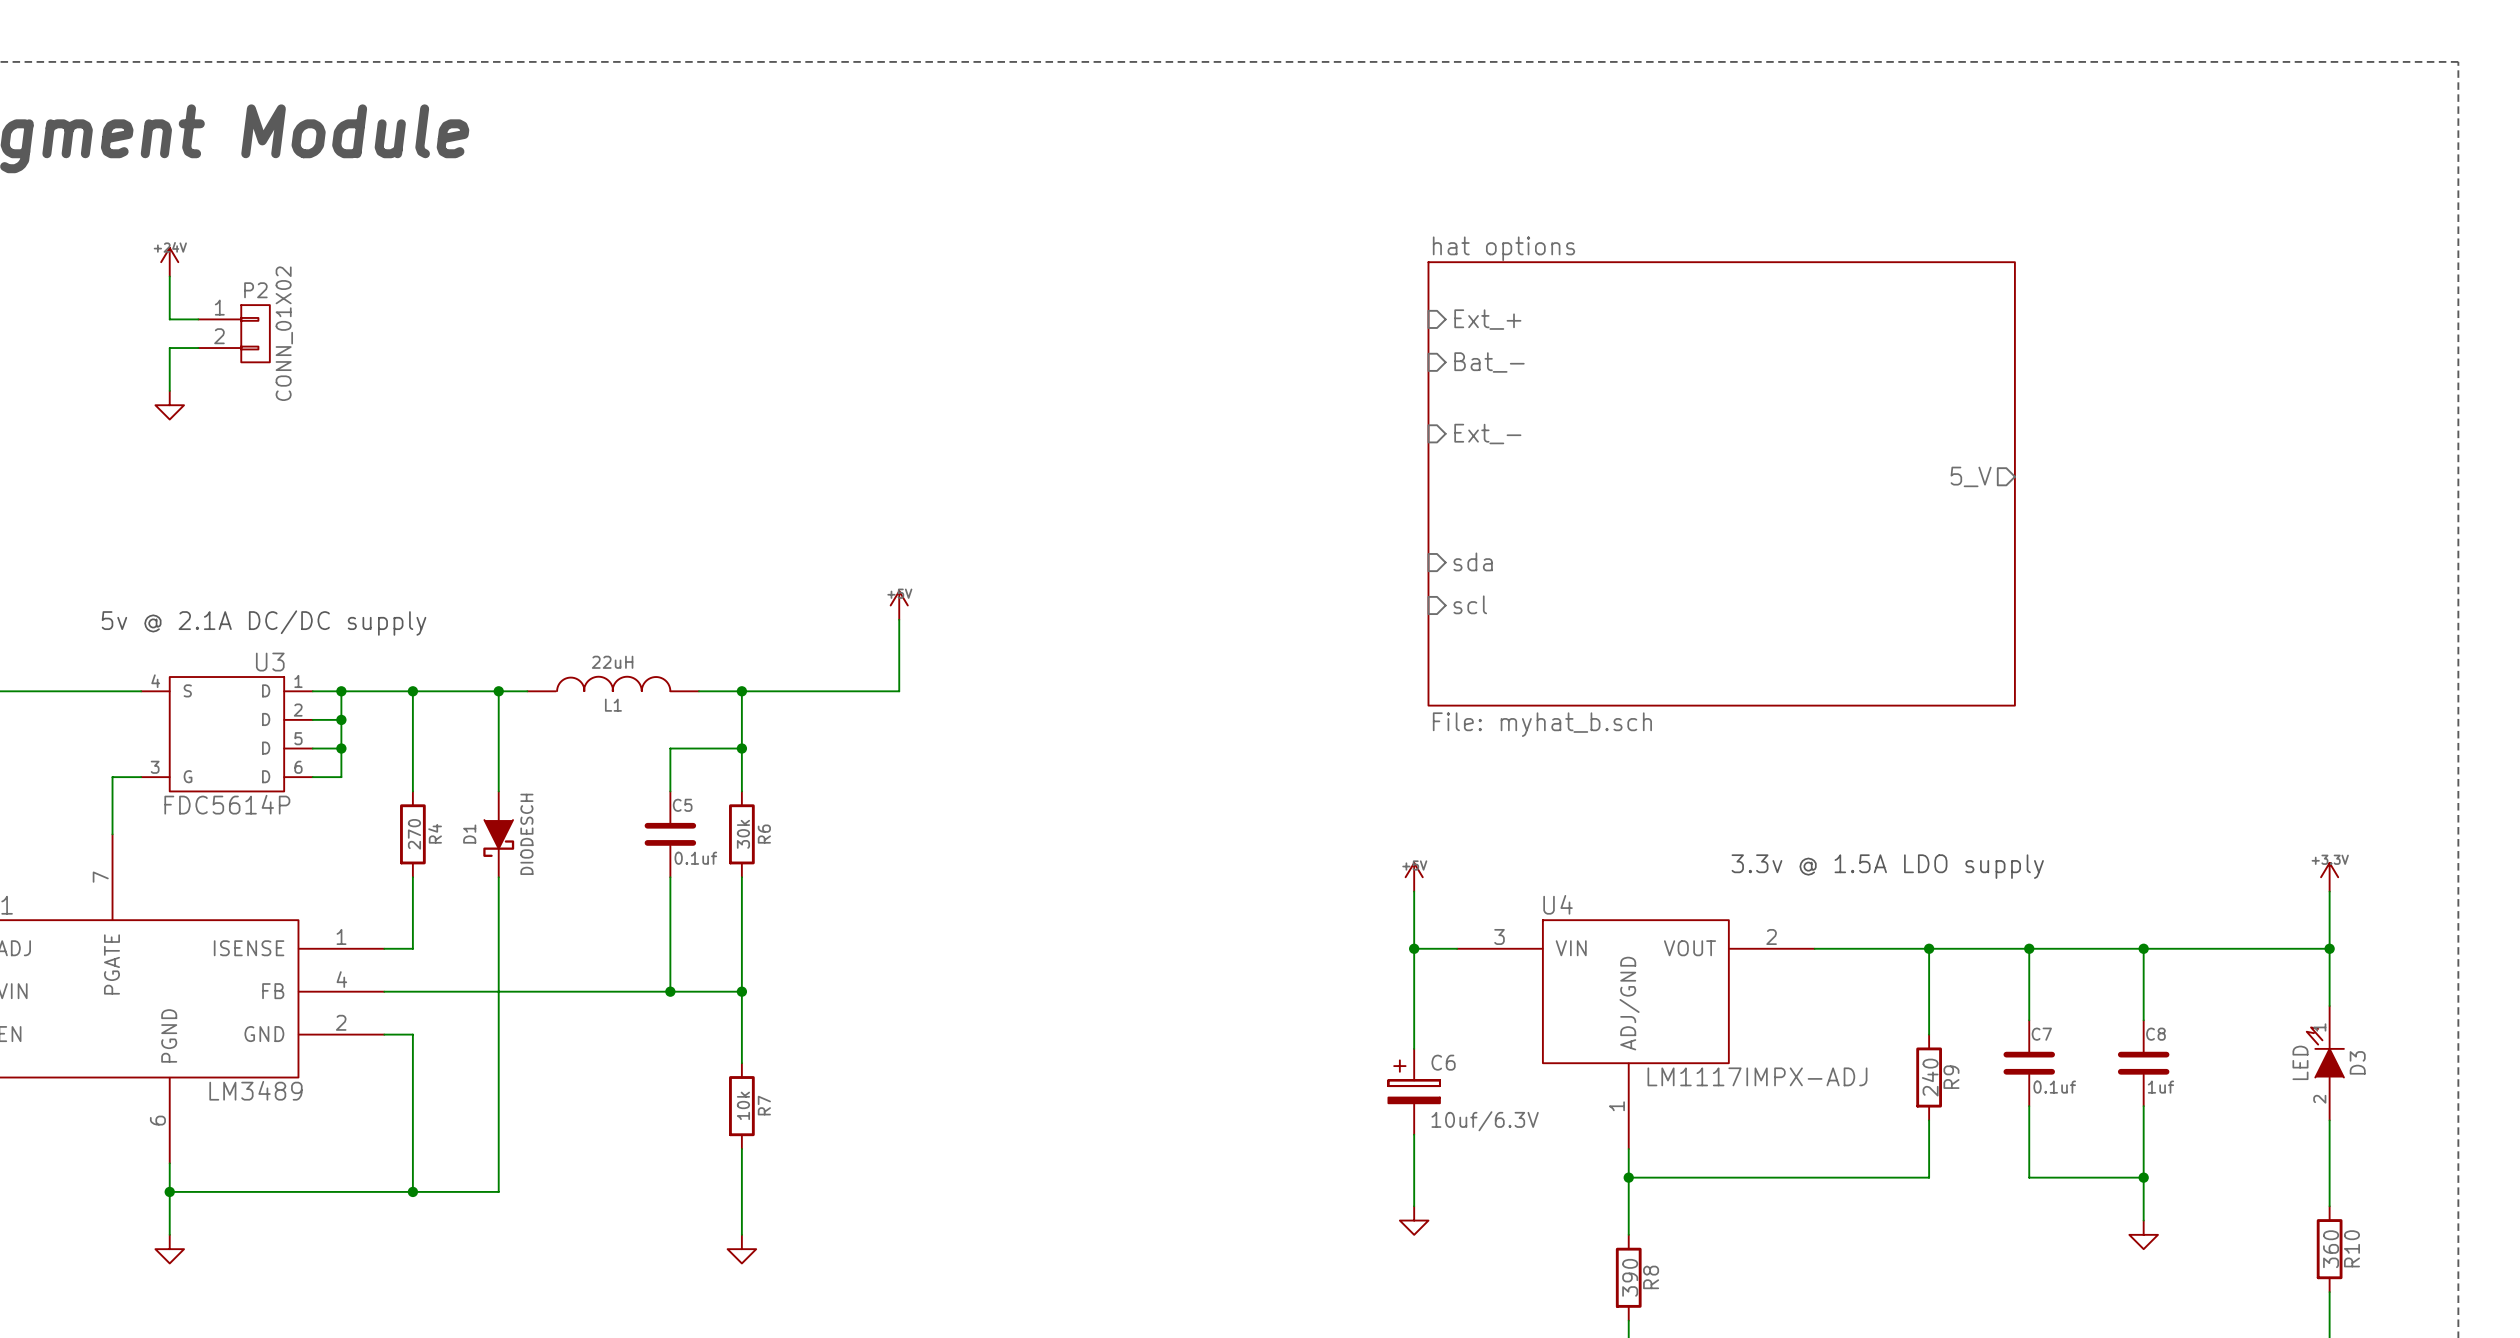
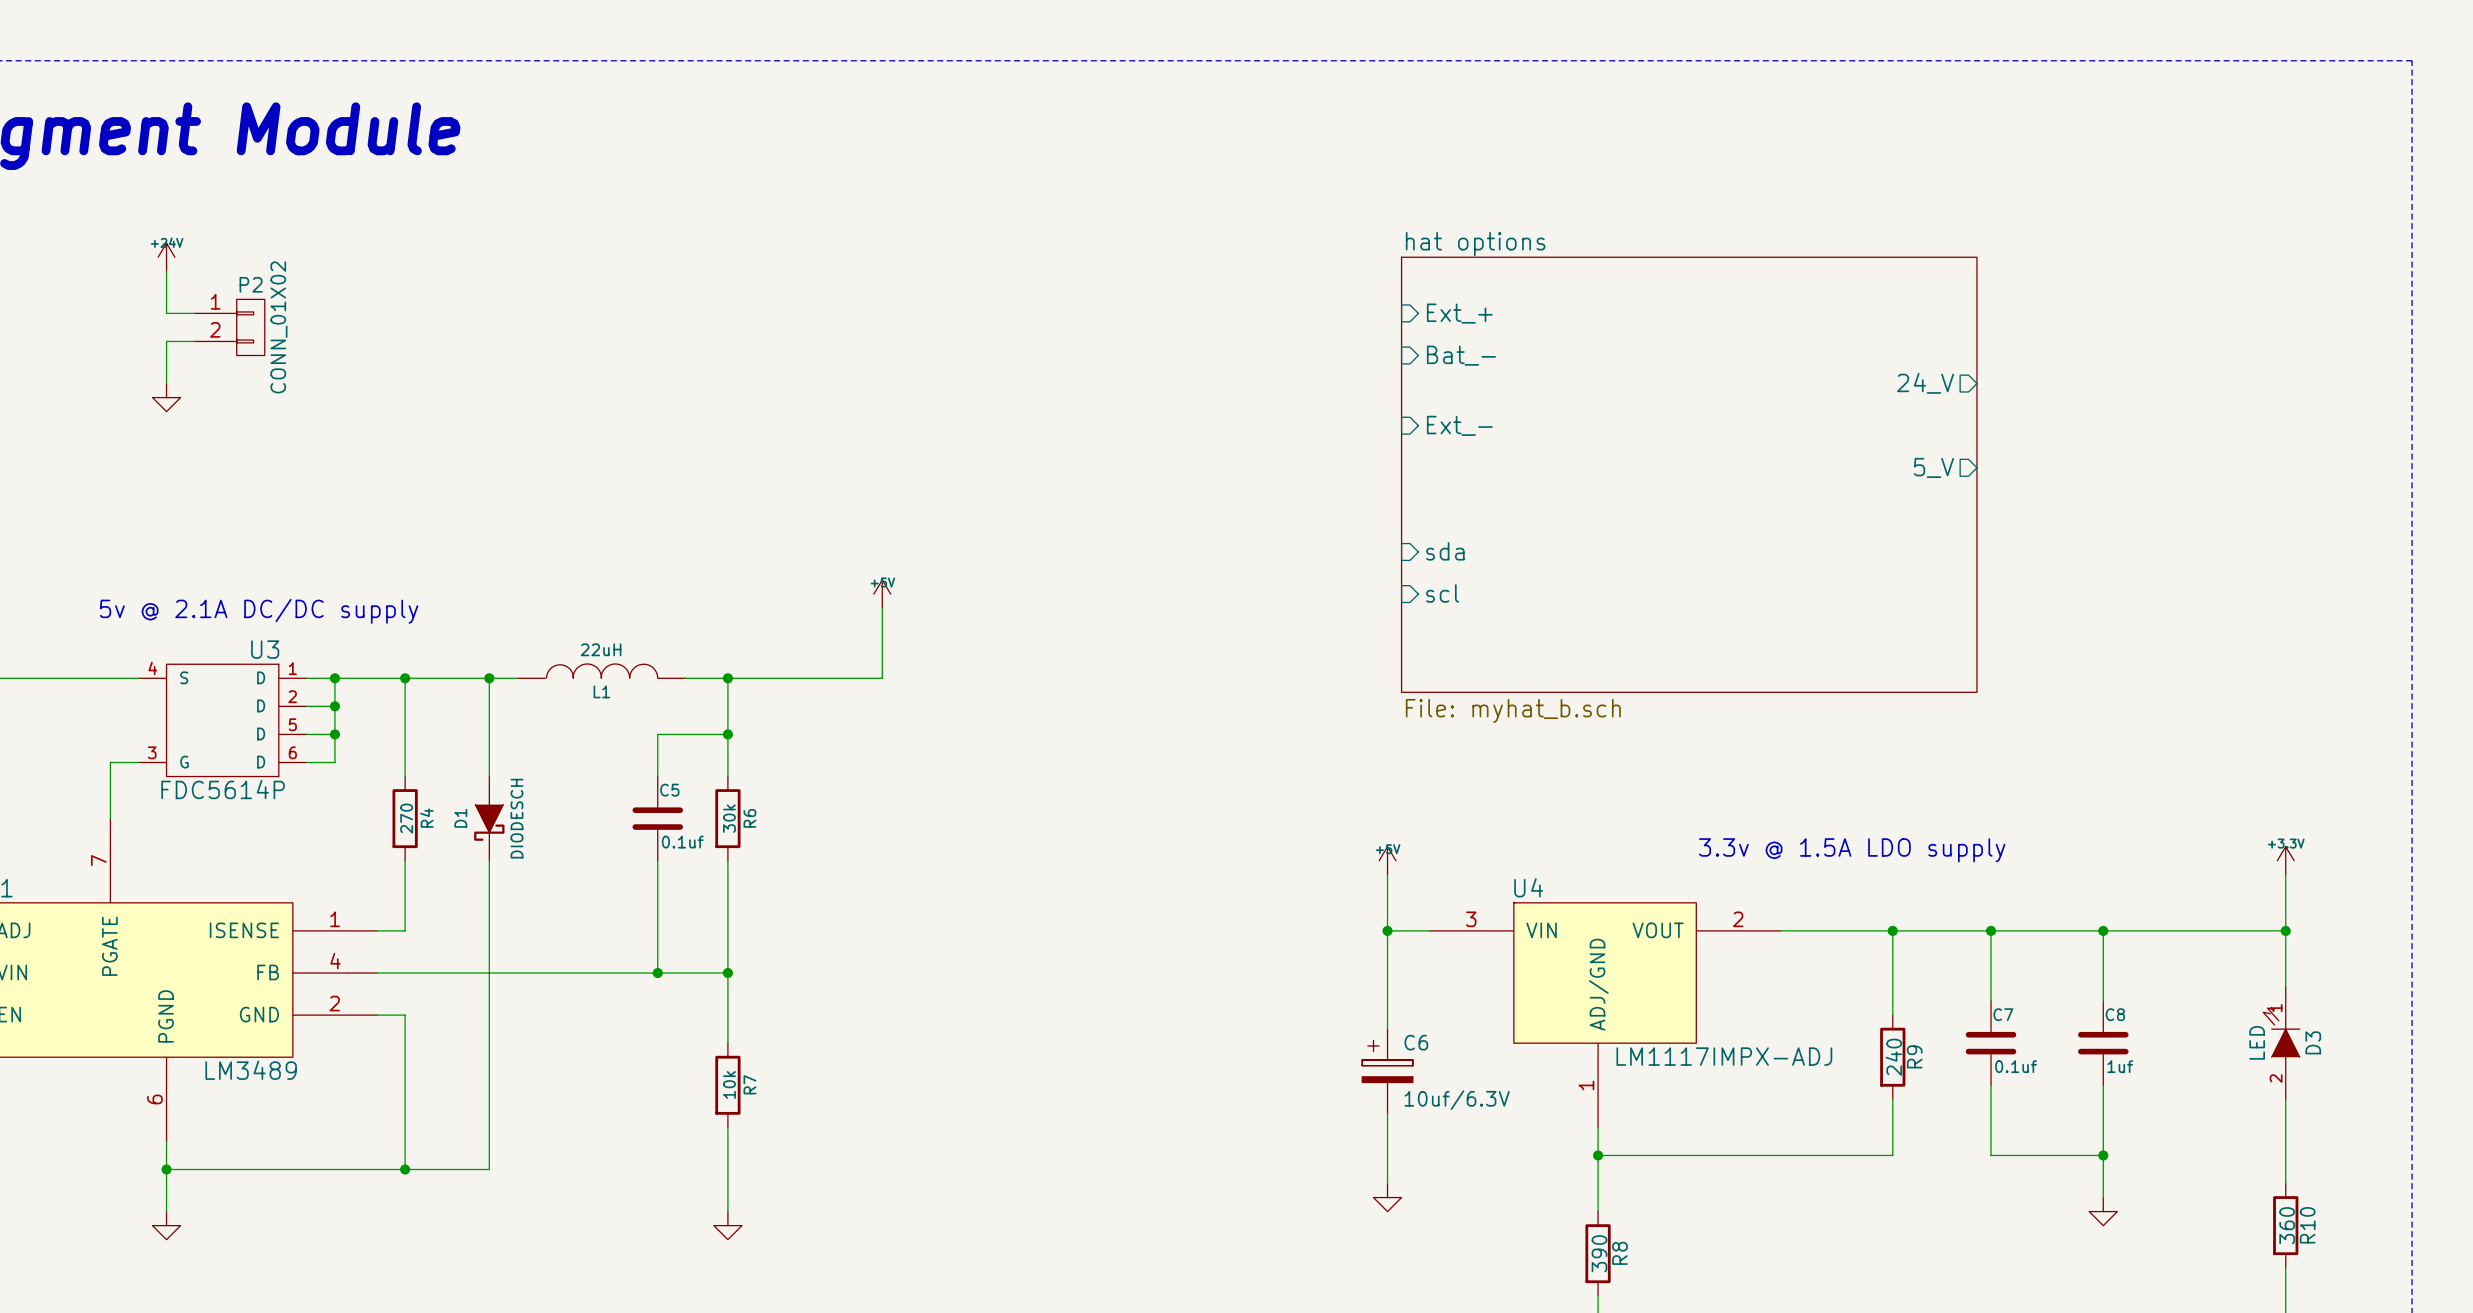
sheet pin: none -> 24_V (1925, 383)

